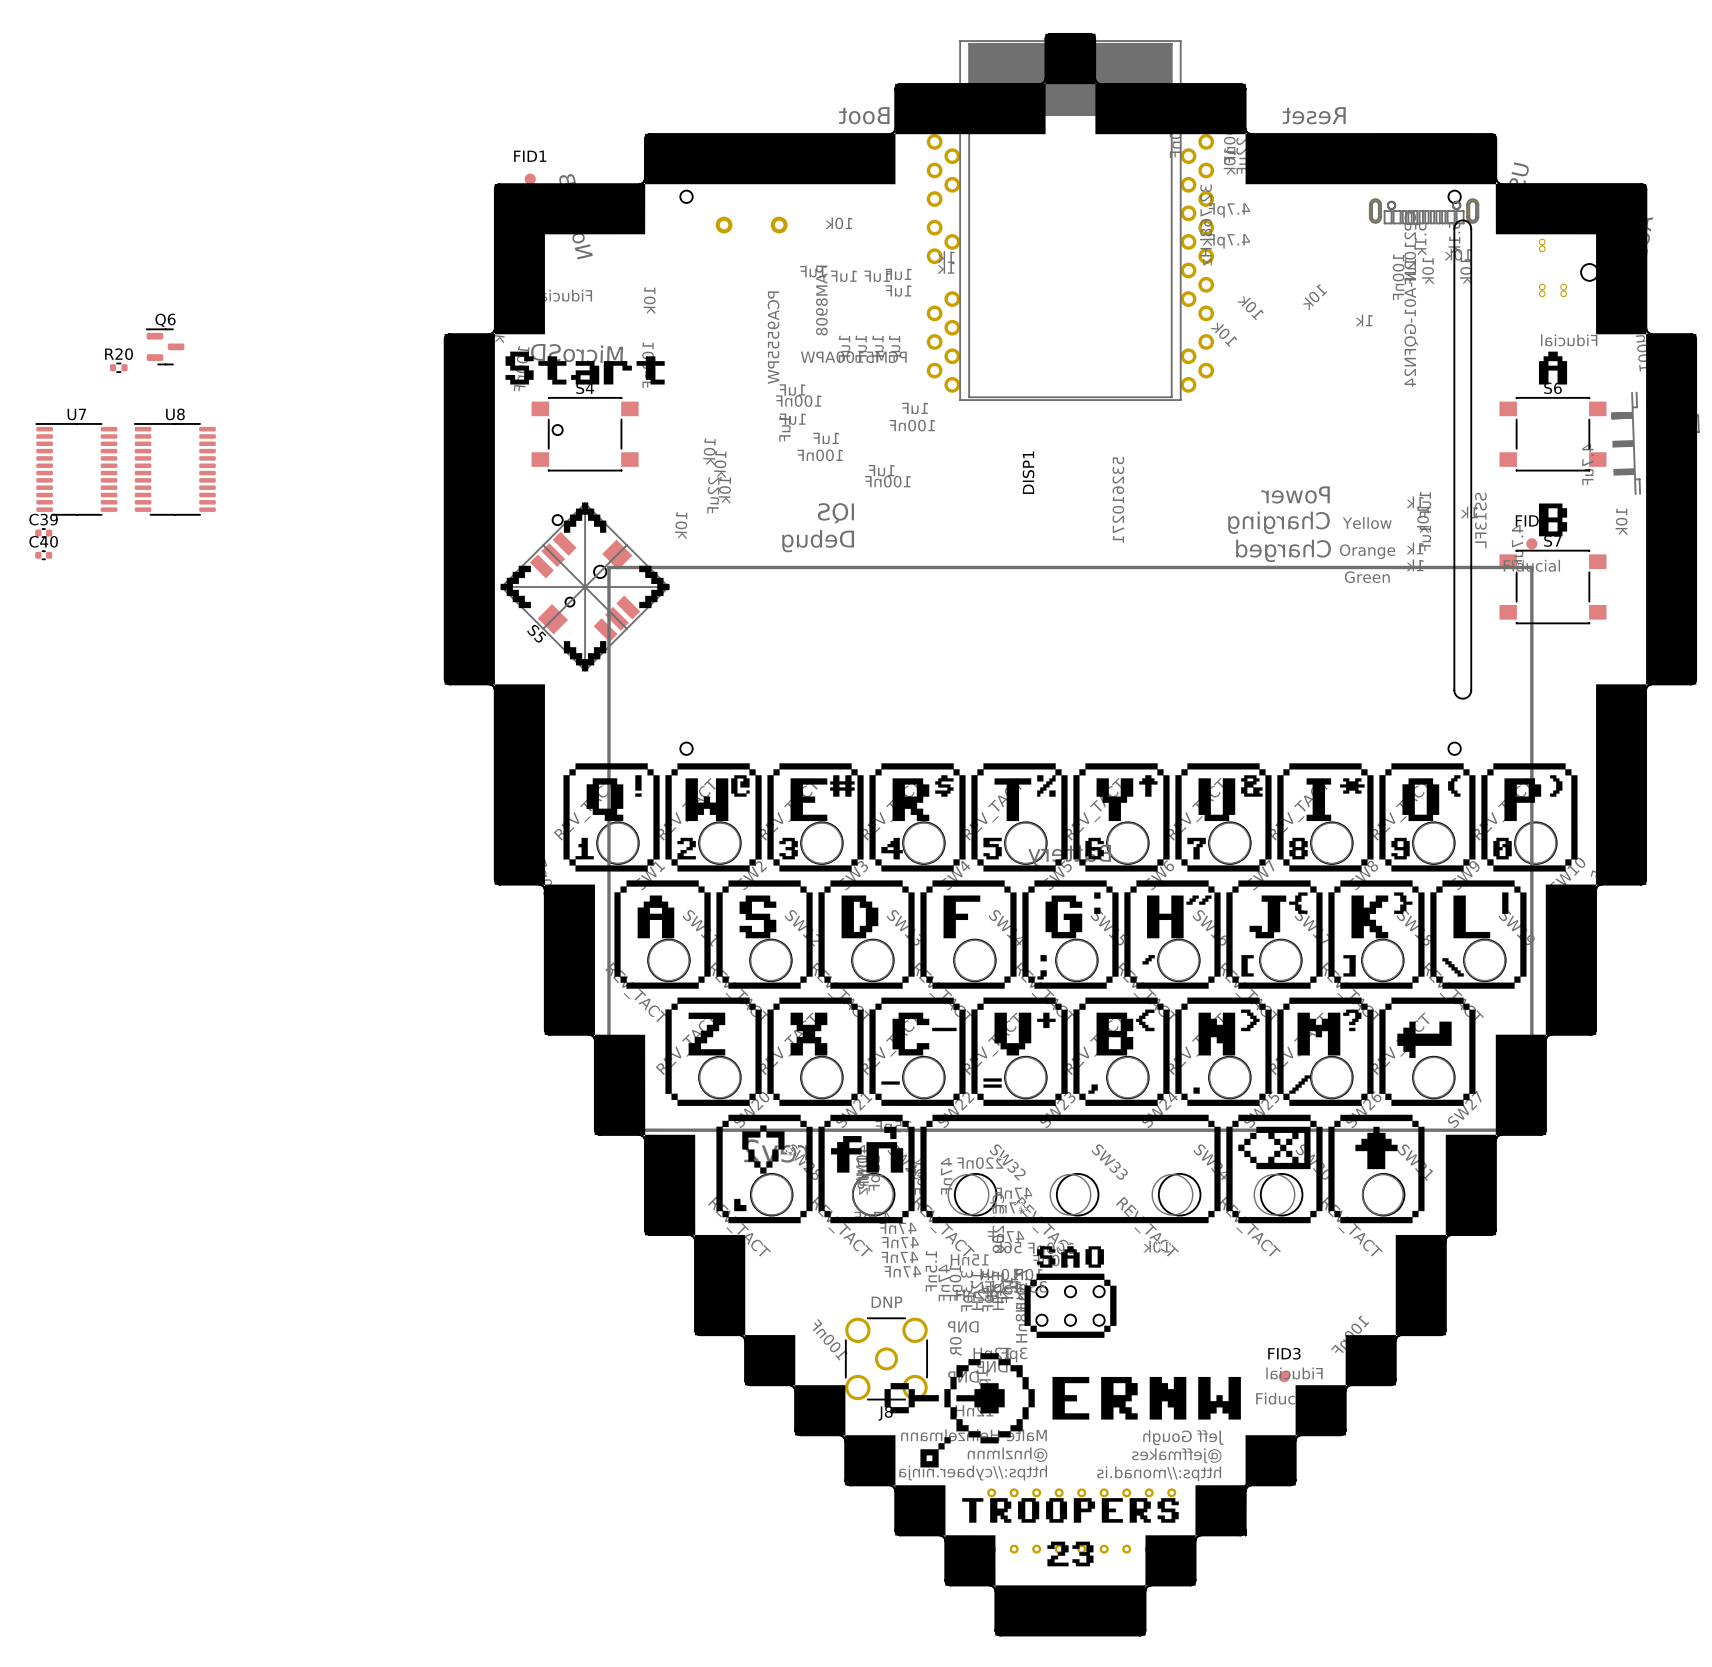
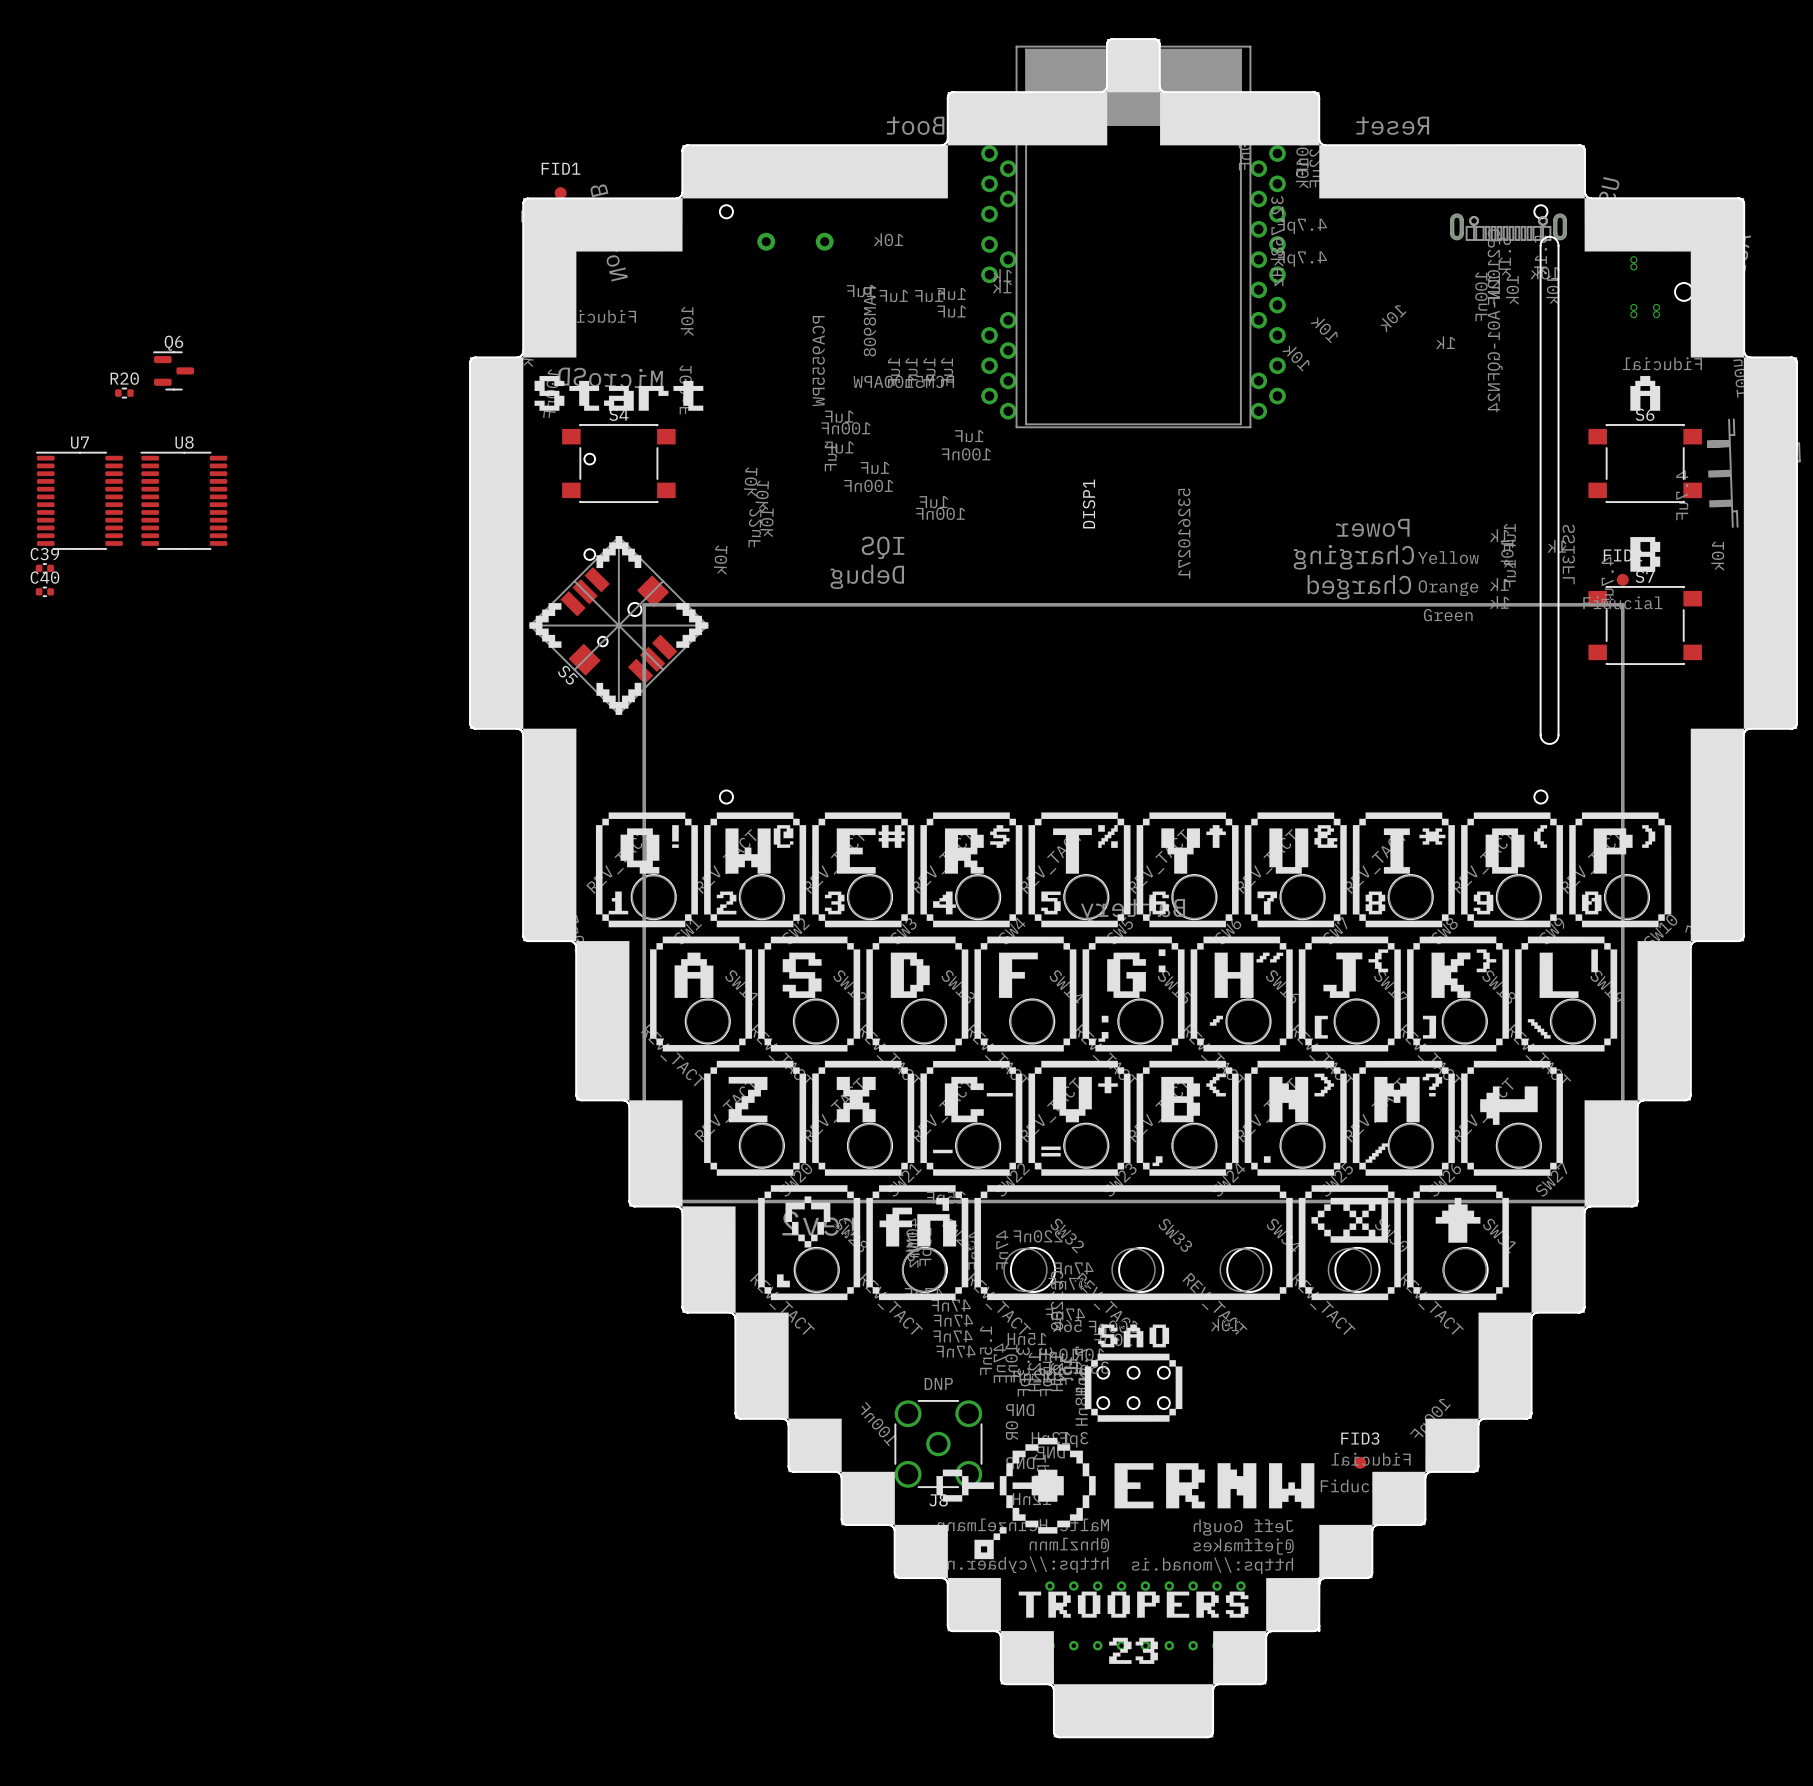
drawing shape: [444, 33, 1697, 1637] -> [469, 38, 1798, 1738]

